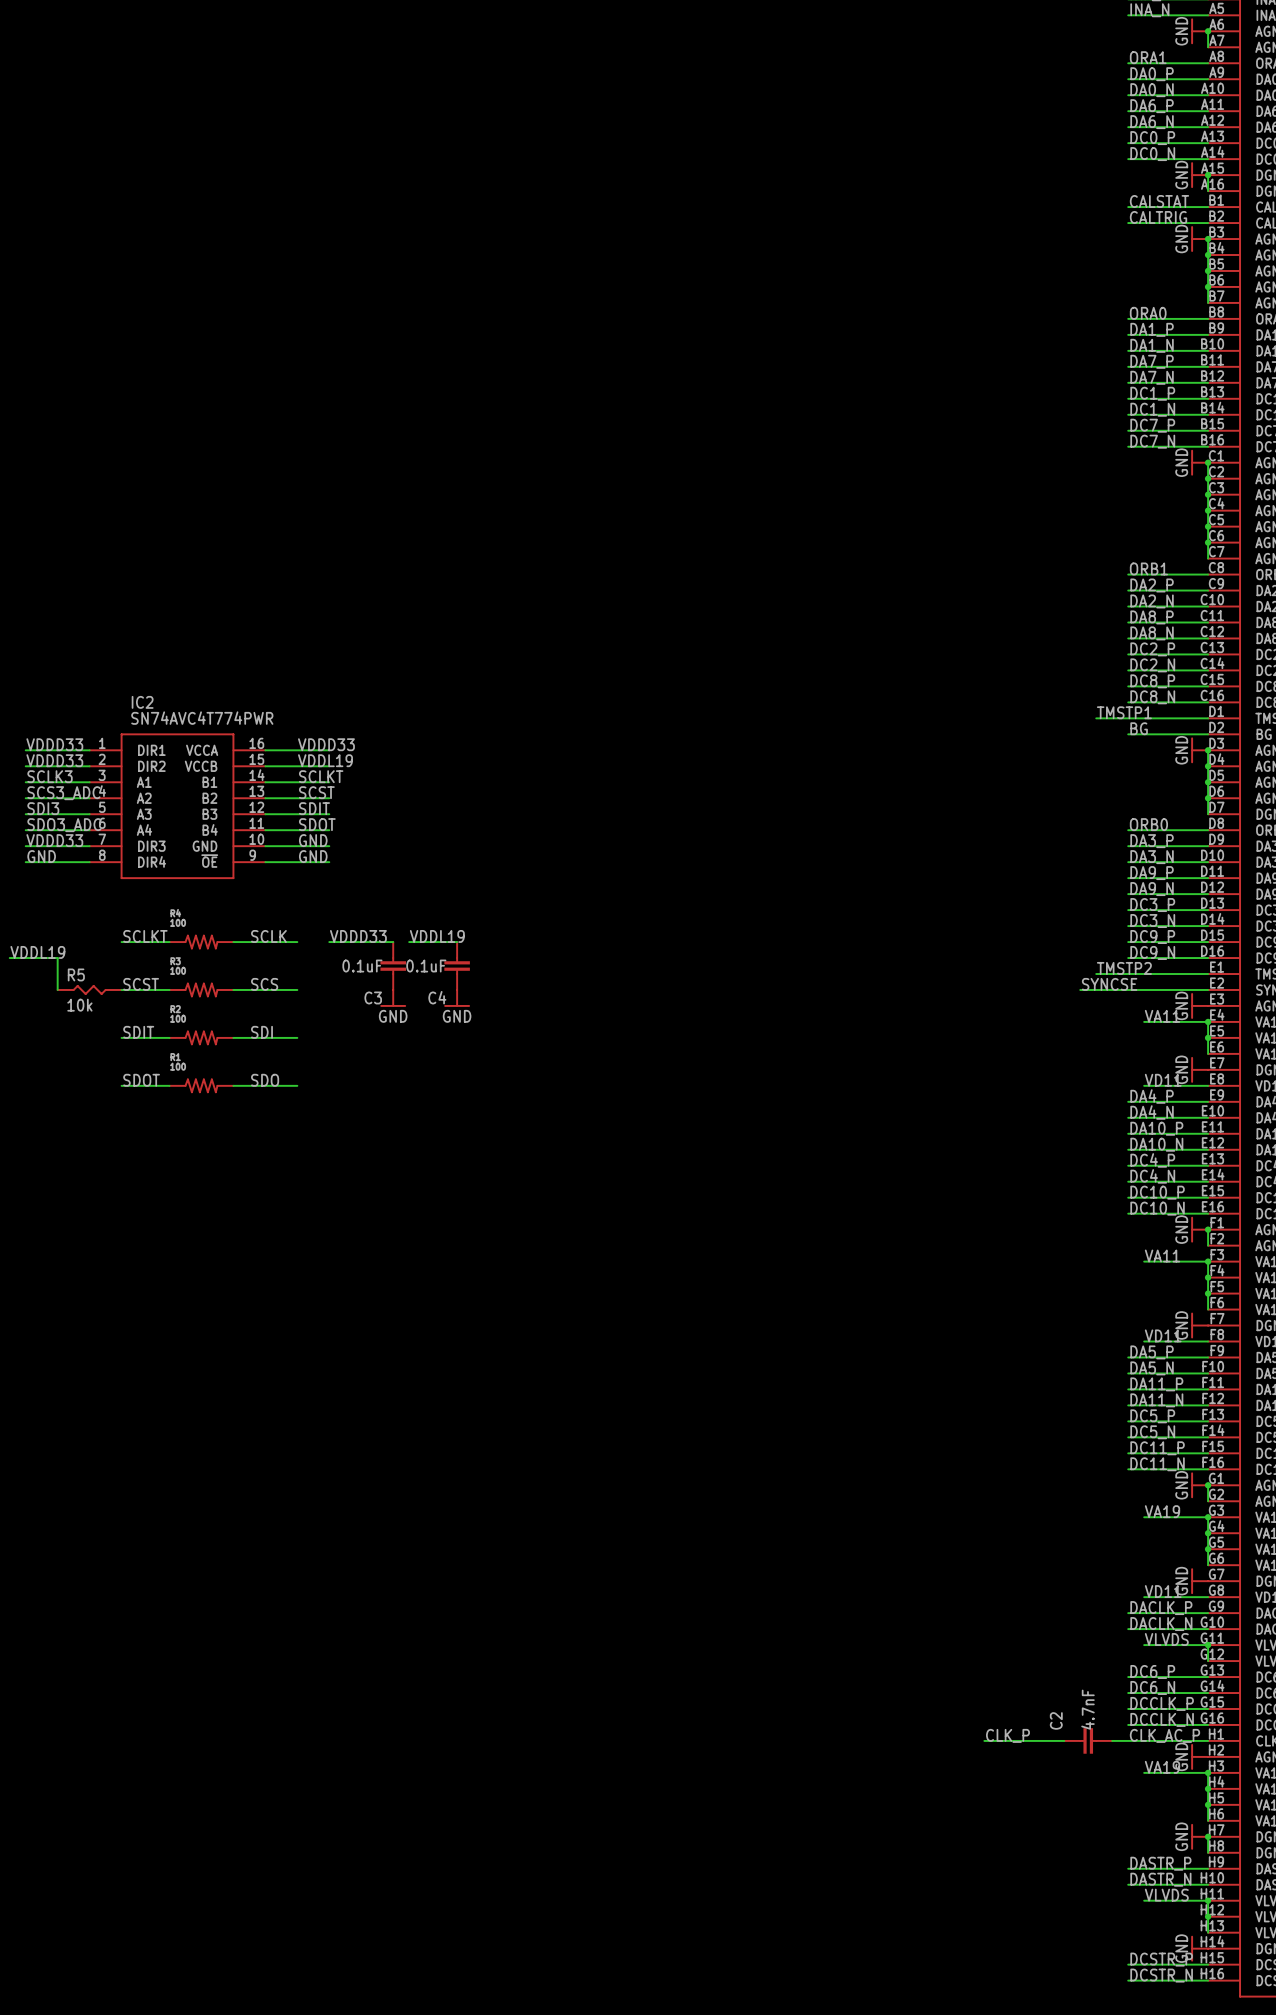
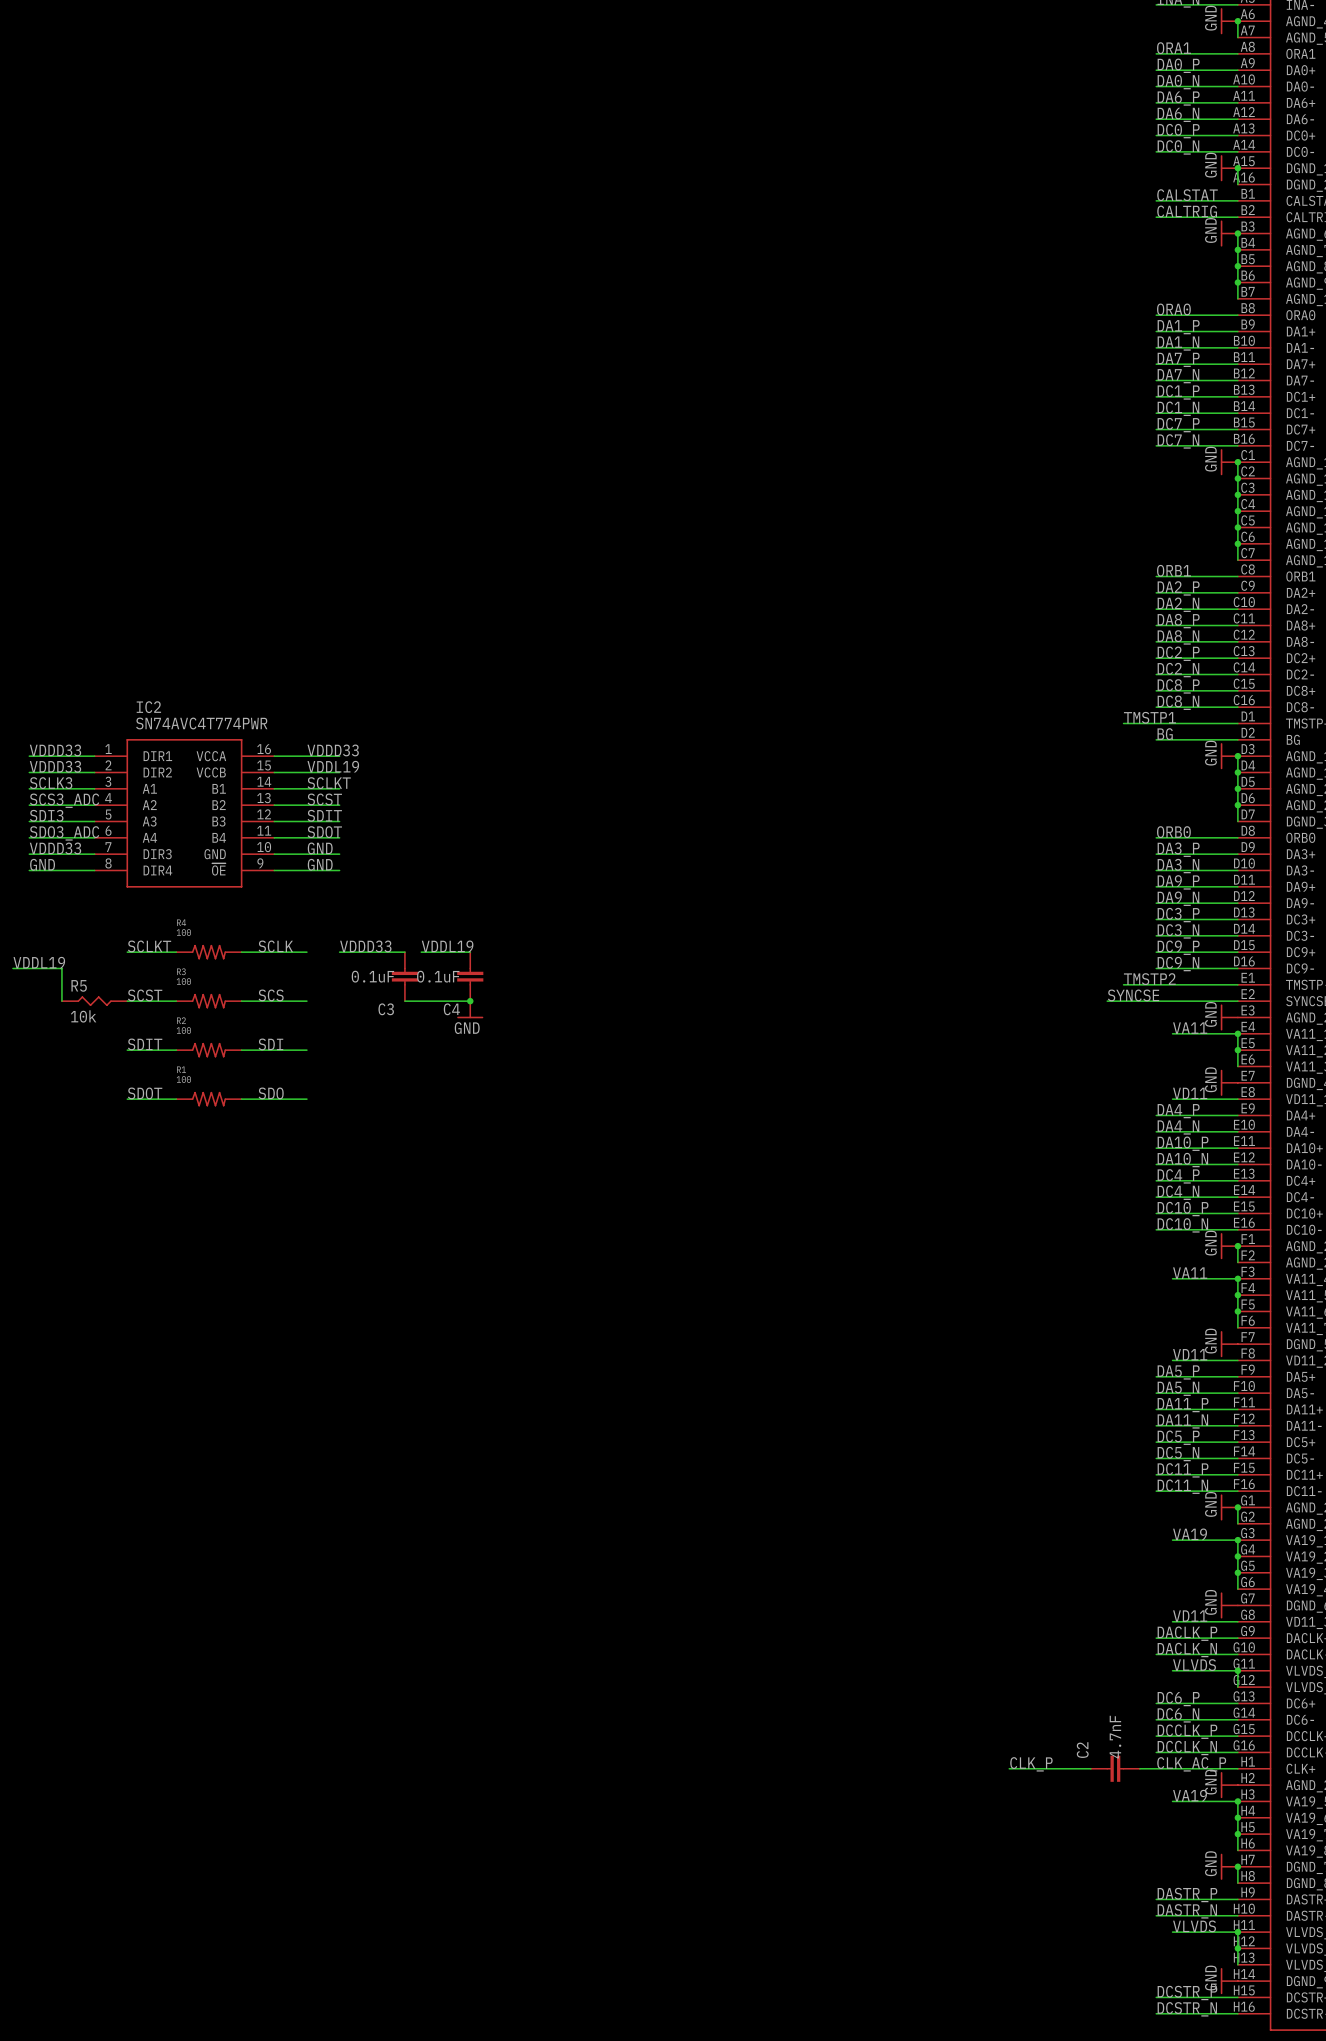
wire: none -> (404, 1001) (470, 1001)
junction: none -> (470, 1001)
power symbol: GND (393, 998) -> none

